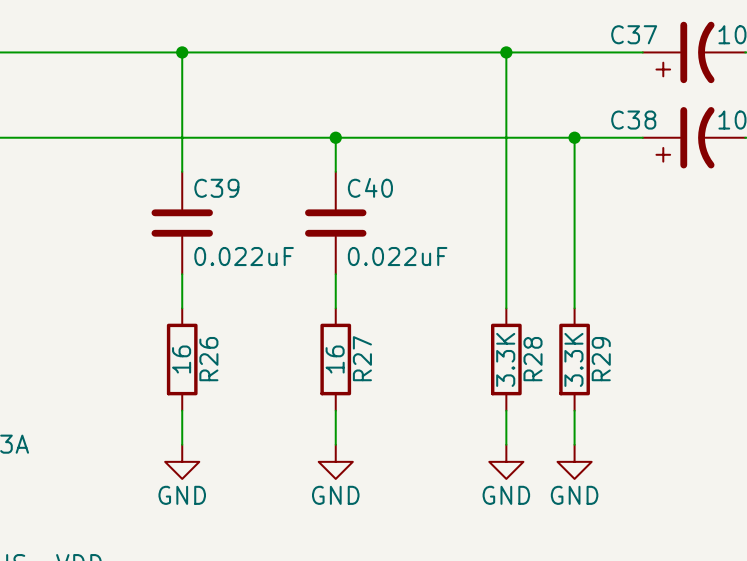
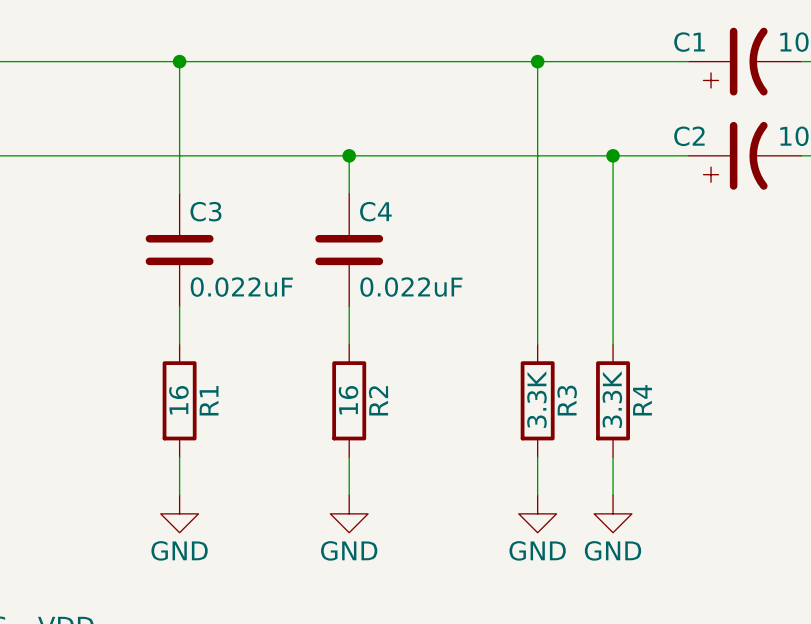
C37 name: C37 (634, 34) -> C1 (689, 42)
C38 name: C38 (633, 120) -> C2 (689, 136)
C40 name: C40 (370, 187) -> C4 (375, 211)
C39 name: C39 (216, 188) -> C3 (205, 211)
R27 name: R27 (362, 358) -> R2 (378, 400)
R26 name: R26 (208, 359) -> R1 (209, 400)
R28 name: R28 (533, 359) -> R3 (567, 400)
R29 name: R29 (601, 359) -> R4 (642, 400)

